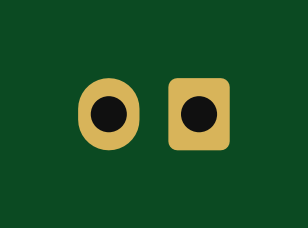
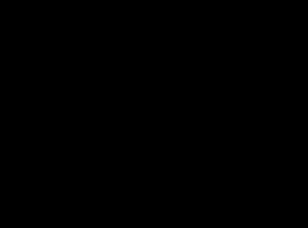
part: (153, 114) -> none

